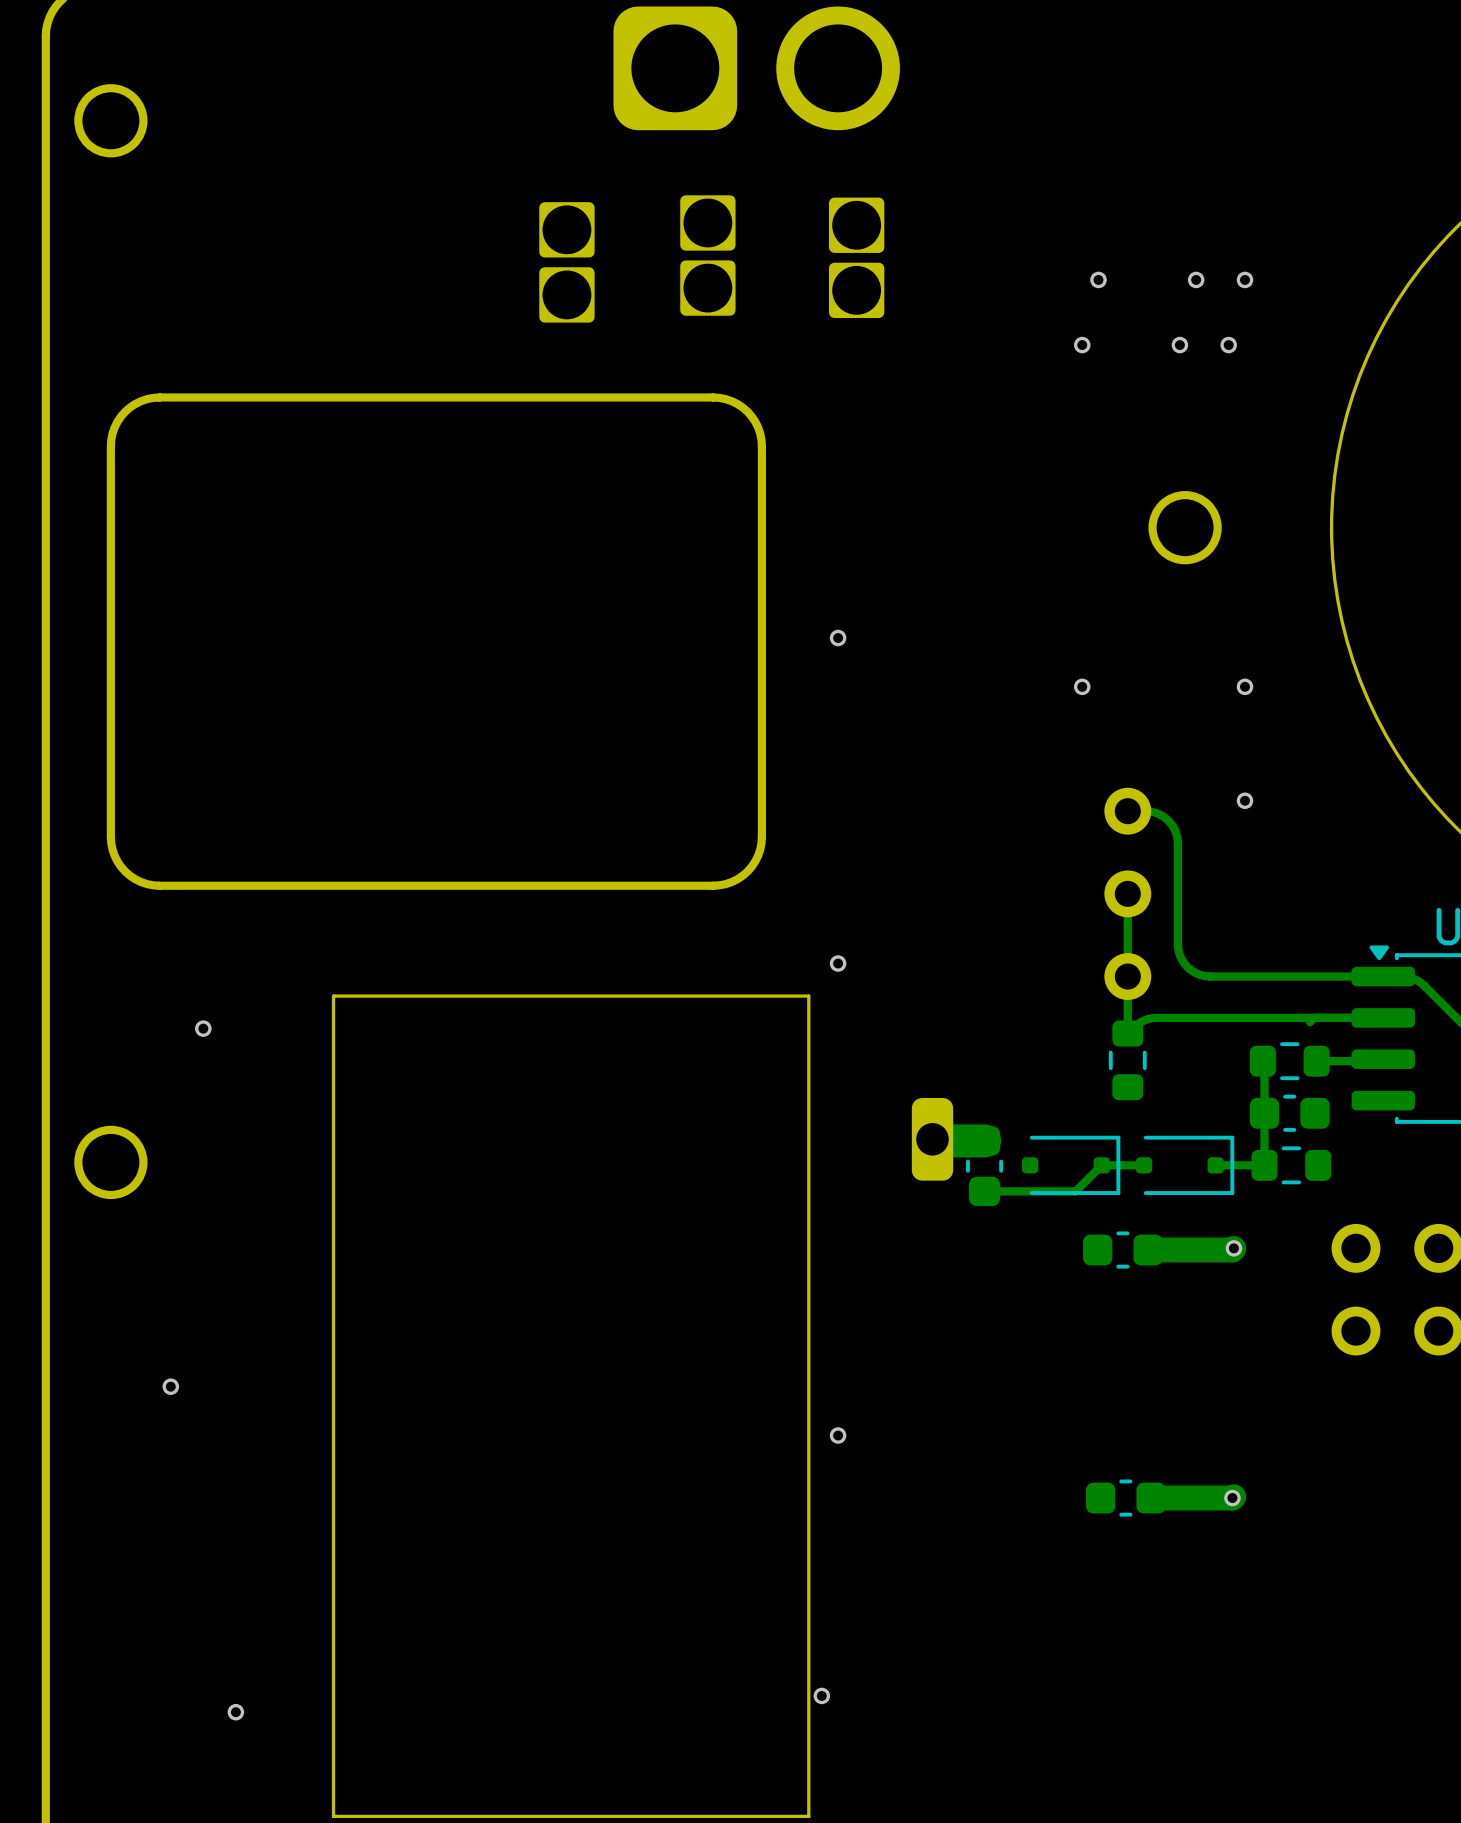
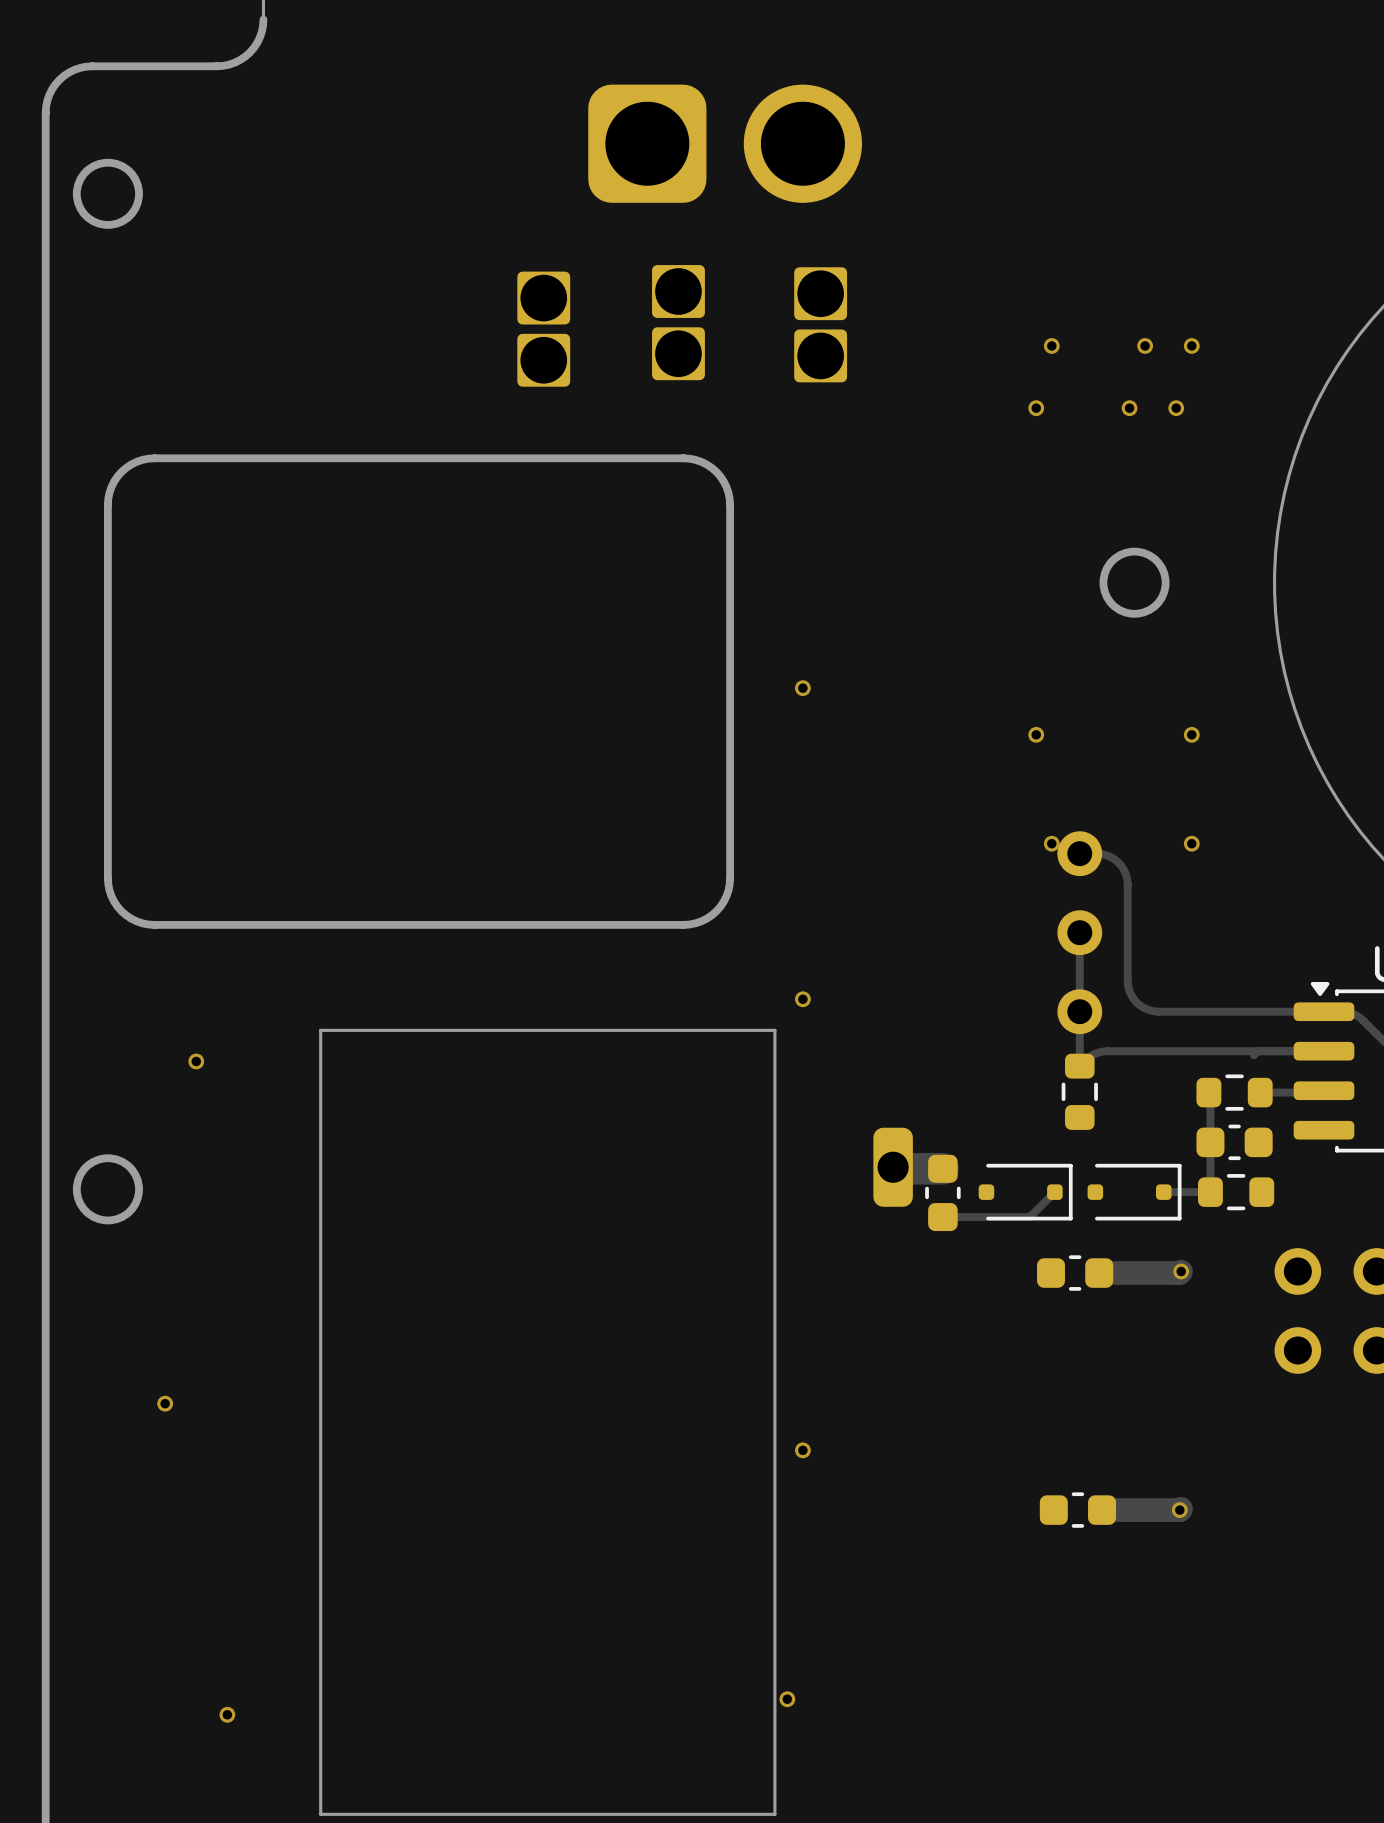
via: none -> (1051, 843)
track: (1144, 1165) (1101, 1165) -> none

